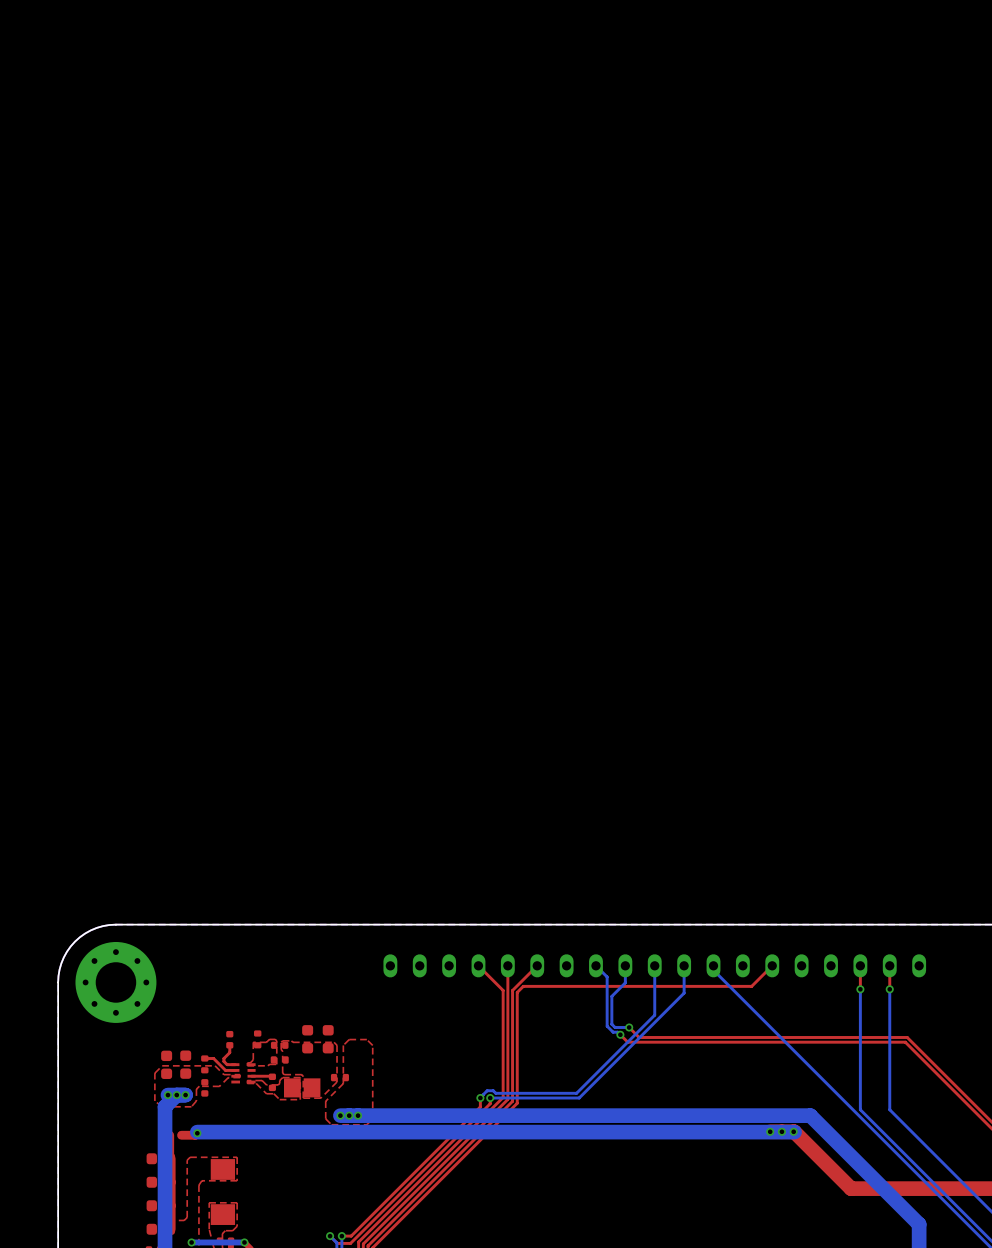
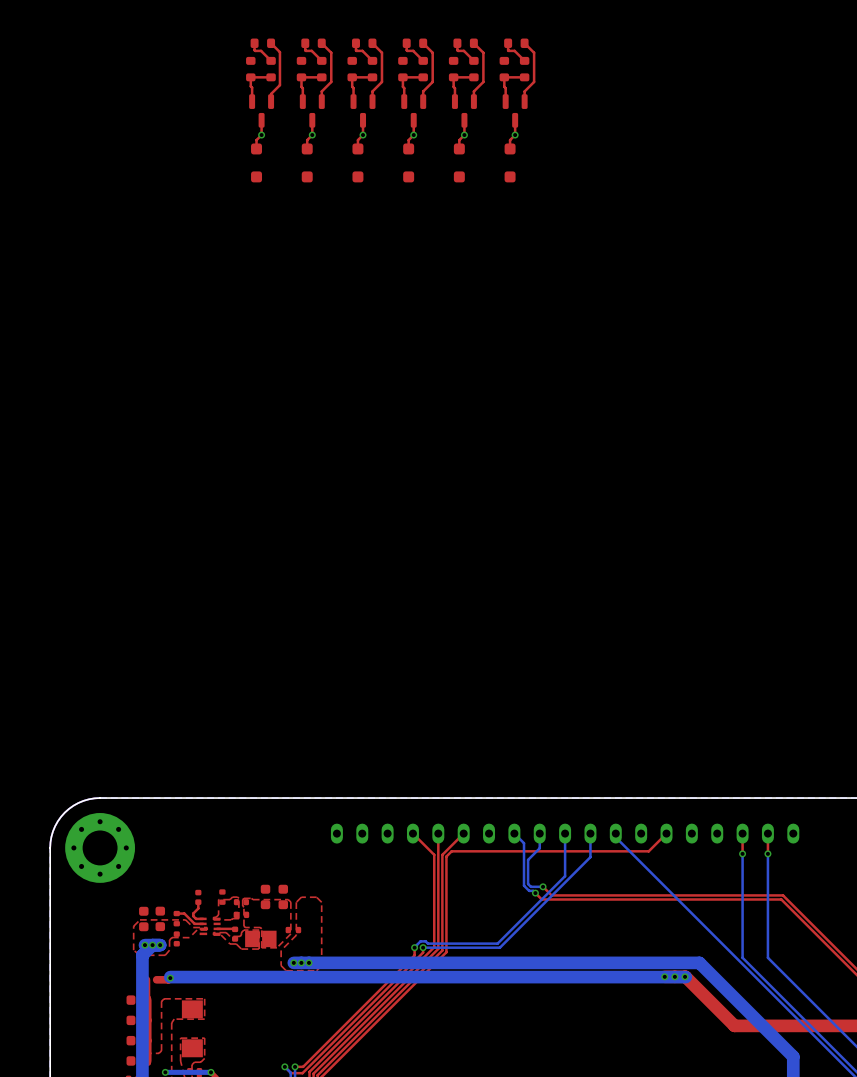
top track: none -> (254, 43) (254, 50) (261, 50) (271, 60)
part: none -> (262, 43)
top track: none -> (271, 43) (279, 52) (279, 85) (271, 93) (271, 101)
top track: none -> (305, 43) (305, 50) (311, 50) (321, 60)
part: none -> (313, 43)
top track: none -> (321, 43) (331, 52) (331, 81) (321, 91) (321, 101)
top track: none -> (355, 43) (355, 50) (362, 50) (372, 60)
part: none -> (364, 43)
top track: none -> (372, 43) (381, 52) (381, 81) (372, 91) (372, 101)
top track: none -> (406, 43) (406, 50) (413, 50) (423, 60)
part: none -> (414, 43)
top track: none -> (423, 43) (432, 52) (432, 81) (423, 91) (423, 101)
top track: none -> (457, 43) (457, 50) (463, 50) (473, 60)
part: none -> (465, 43)
top track: none -> (473, 43) (483, 52) (483, 81) (473, 91) (473, 101)
top track: none -> (508, 43) (508, 50) (514, 50) (524, 60)
part: none -> (516, 43)
top track: none -> (524, 43) (534, 52) (534, 81) (524, 91) (524, 101)
part: none -> (250, 69)
part: none -> (271, 69)
part: none -> (301, 69)
part: none -> (321, 69)
part: none -> (352, 69)
part: none -> (372, 69)
part: none -> (402, 69)
part: none -> (423, 69)
part: none -> (453, 69)
part: none -> (473, 69)
part: none -> (504, 69)
part: none -> (524, 69)
top track: none -> (271, 77) (250, 77) (252, 101)
top track: none -> (321, 77) (301, 77) (302, 101)
top track: none -> (372, 77) (352, 77) (353, 101)
top track: none -> (423, 77) (402, 77) (404, 101)
top track: none -> (473, 77) (453, 77) (454, 101)
top track: none -> (524, 77) (504, 77) (505, 101)
part: none -> (261, 110)
part: none -> (312, 110)
part: none -> (363, 110)
part: none -> (413, 110)
part: none -> (464, 110)
part: none -> (515, 110)
top track: none -> (261, 120) (261, 135) (256, 140) (256, 148)
top track: none -> (312, 120) (312, 135) (307, 140) (307, 146)
top track: none -> (363, 120) (363, 135) (357, 140) (357, 146)
top track: none -> (413, 120) (413, 135) (408, 140) (408, 146)
top track: none -> (464, 120) (464, 135) (459, 140) (459, 146)
top track: none -> (515, 120) (515, 135) (510, 140) (510, 146)
via: none -> (261, 135)
via: none -> (312, 135)
via: none -> (363, 135)
via: none -> (413, 135)
via: none -> (464, 135)
via: none -> (515, 135)
part: none -> (256, 162)
part: none -> (307, 162)
part: none -> (357, 162)
part: none -> (408, 162)
part: none -> (459, 162)
part: none -> (510, 162)

